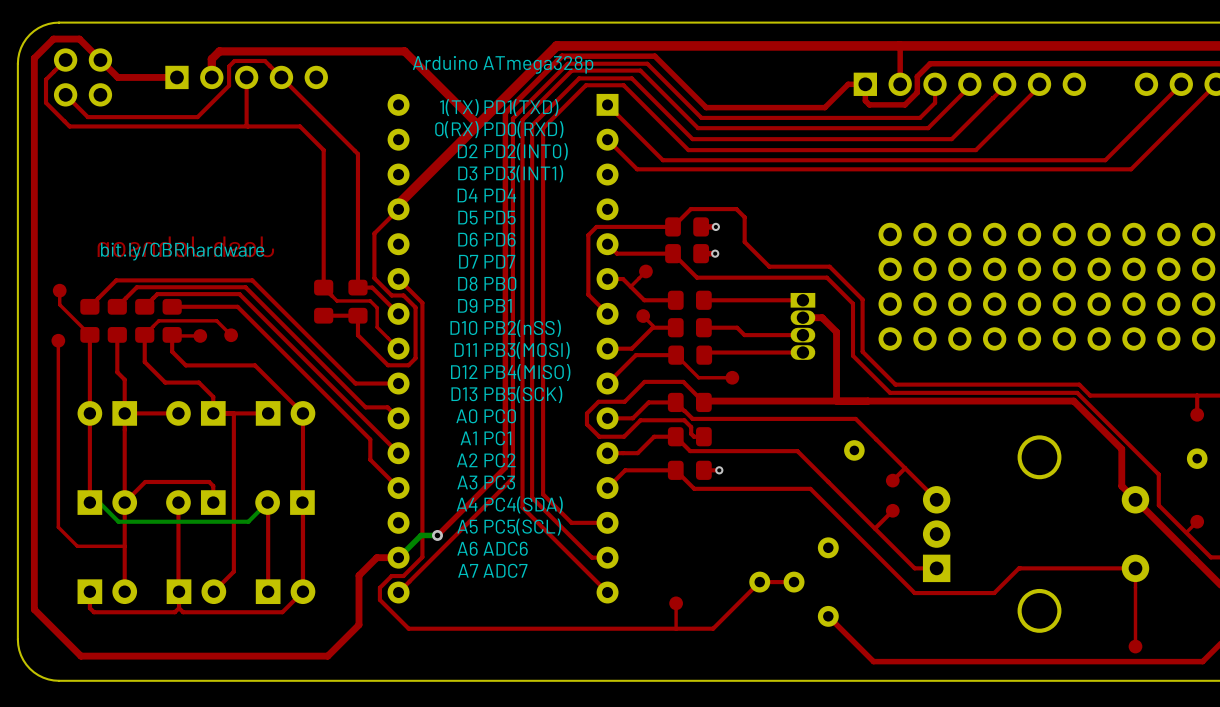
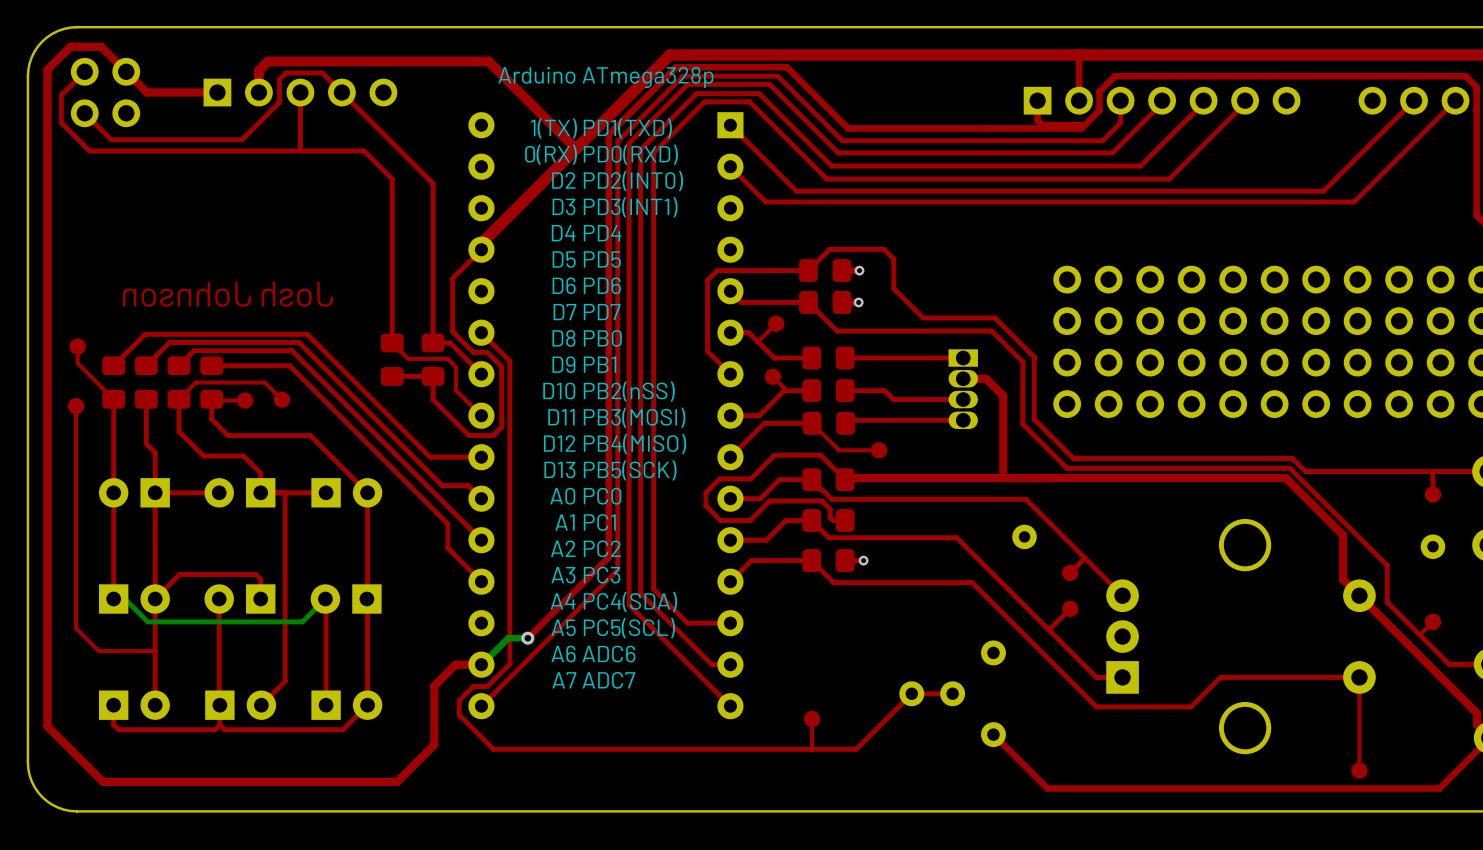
top track: (865, 84) (848, 84) (824, 107) -> (1084, 125) (1081, 128) (989, 128)
text: bit.ly/CBRhardware (182, 251) -> none

